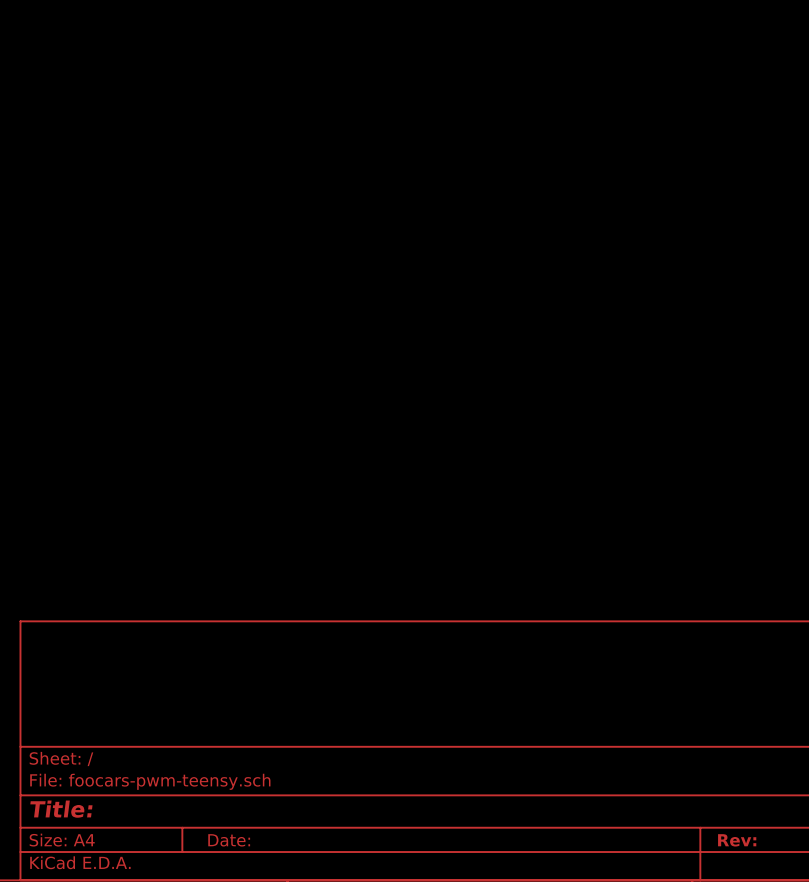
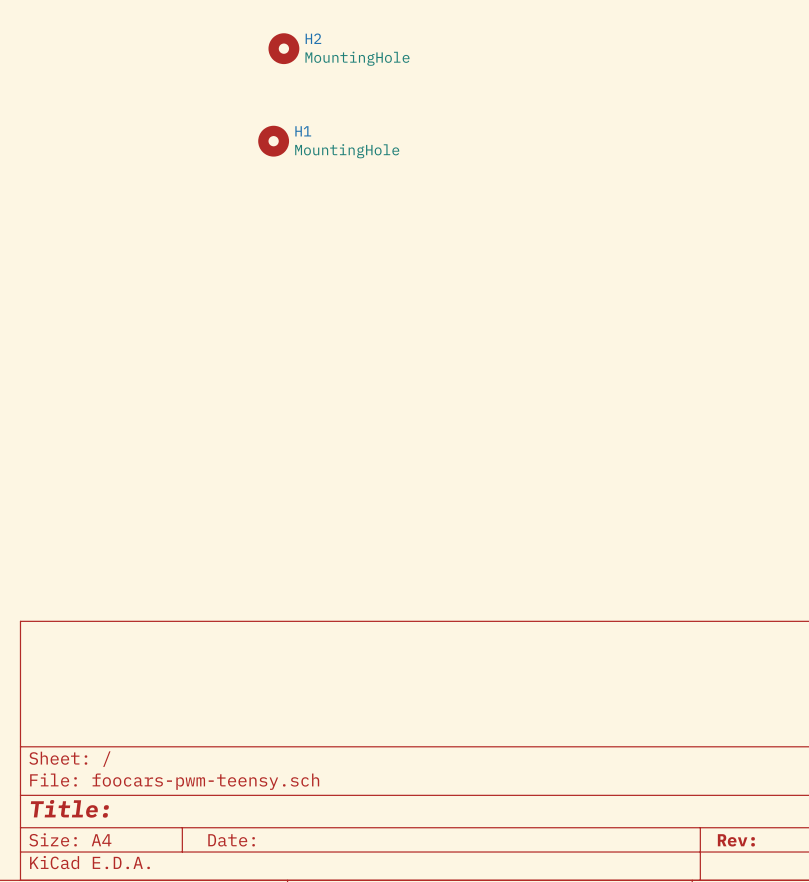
H2: none -> MountingHole (283, 48)
H1: none -> MountingHole (273, 141)

